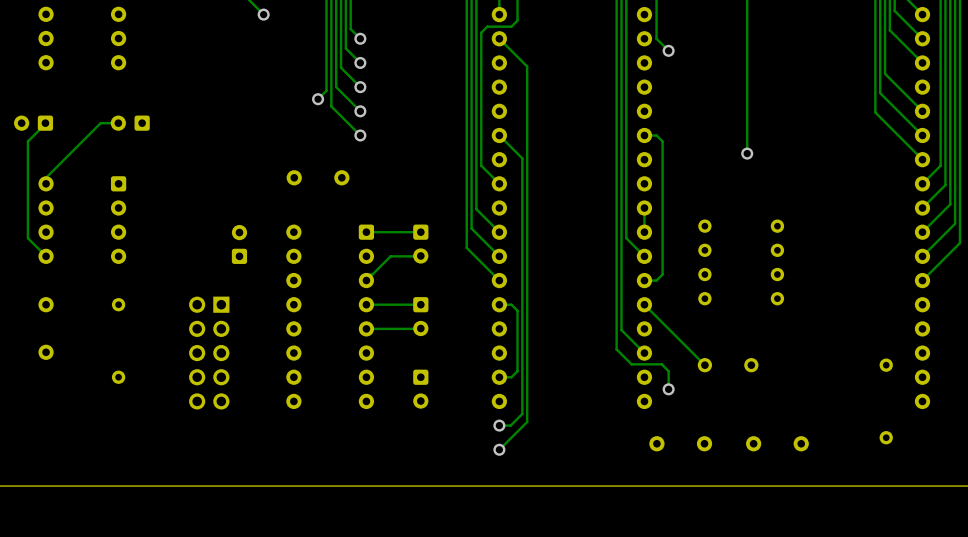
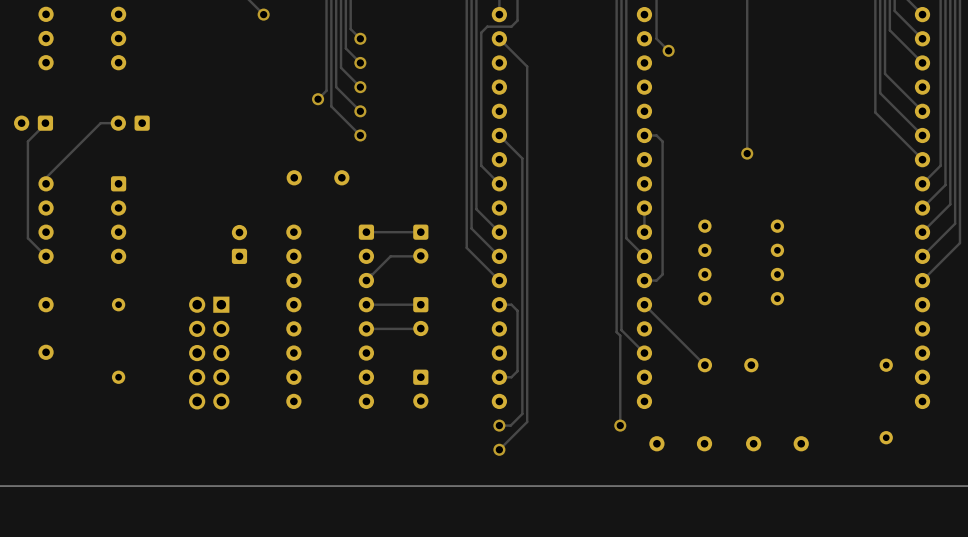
track: (616, 332) (616, 349) (631, 364) (661, 364) (668, 371) (668, 389) -> (616, 332) (620, 335) (620, 425)
via: (668, 389) -> none
via: none -> (620, 425)

